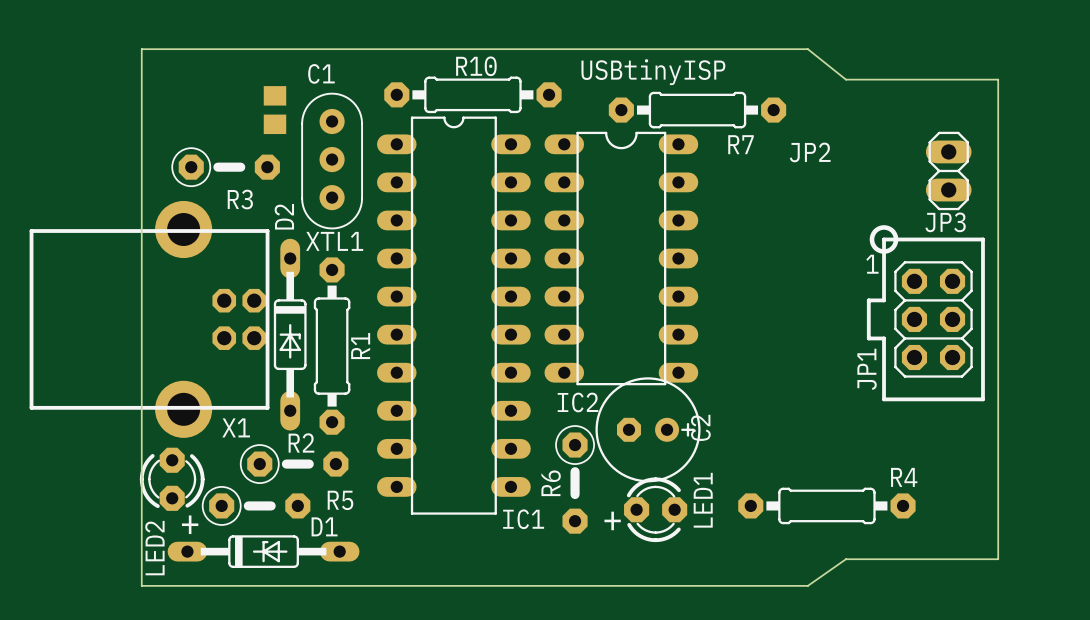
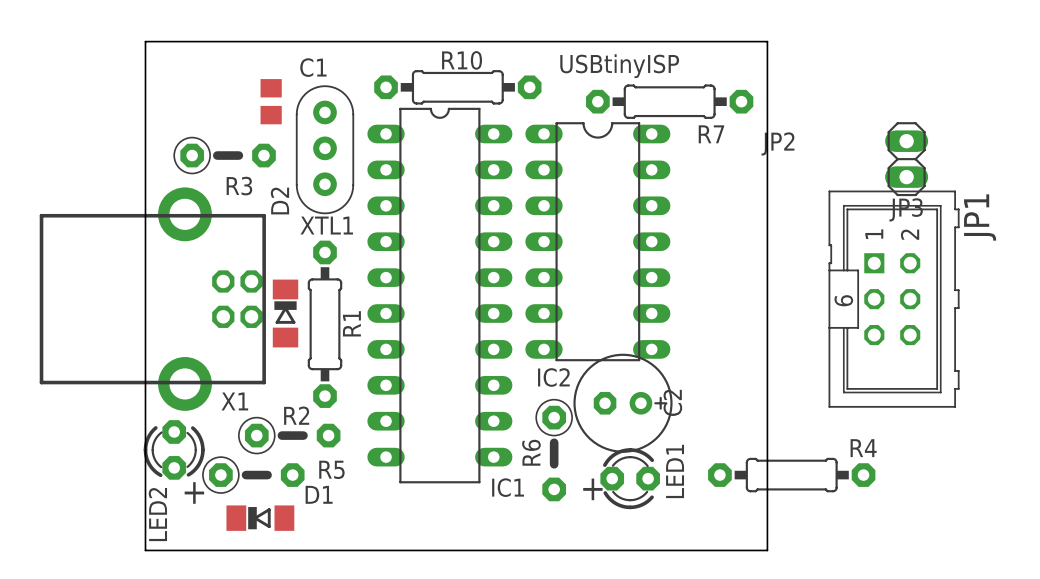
board edge: (141, 49) (807, 49) (845, 79) (998, 79) (998, 559) (845, 559) (807, 585) (801, 585) -> (145, 44) (145, 41) (767, 41) (767, 550)
drawing: [869, 225, 899, 254] -> none
part footprint: [273, 238, 307, 431] -> [272, 279, 299, 348]
line: (884, 239) (884, 300) (868, 300) (868, 338) (884, 338) (884, 399) (982, 399) (982, 239) (884, 239) -> none
text: 1 (872, 264) -> none
part: (933, 319) -> none
JP1: none -> (894, 299)
text: JP1 (867, 369) -> none
part footprint: [167, 535, 360, 568] -> [226, 505, 295, 531]

